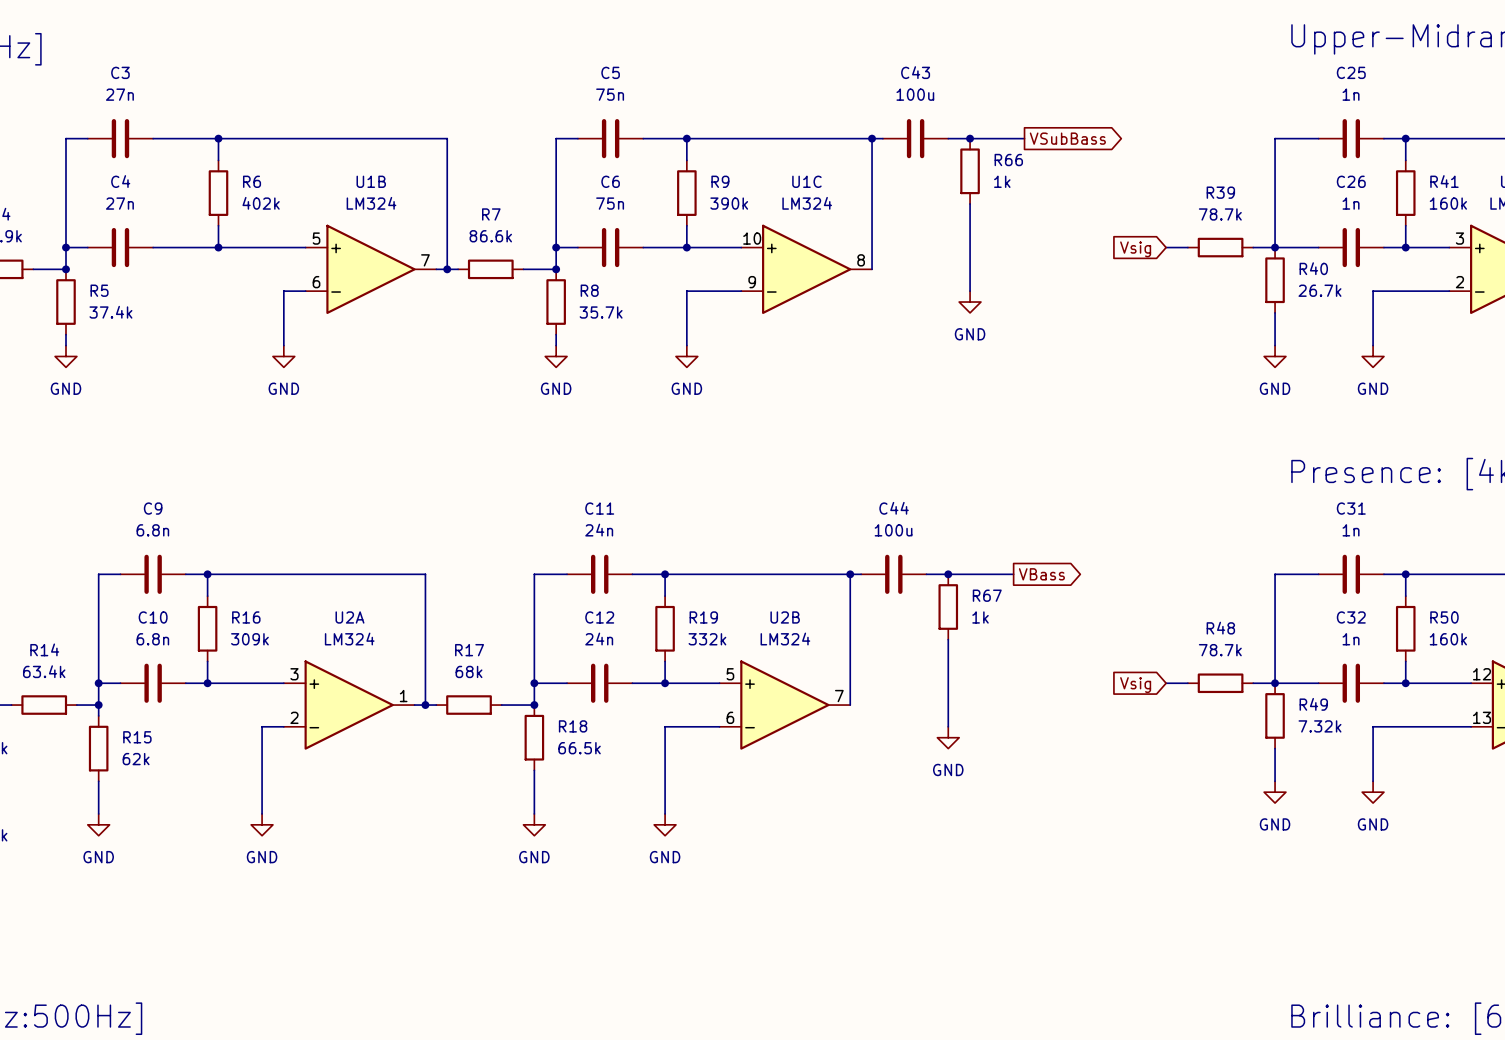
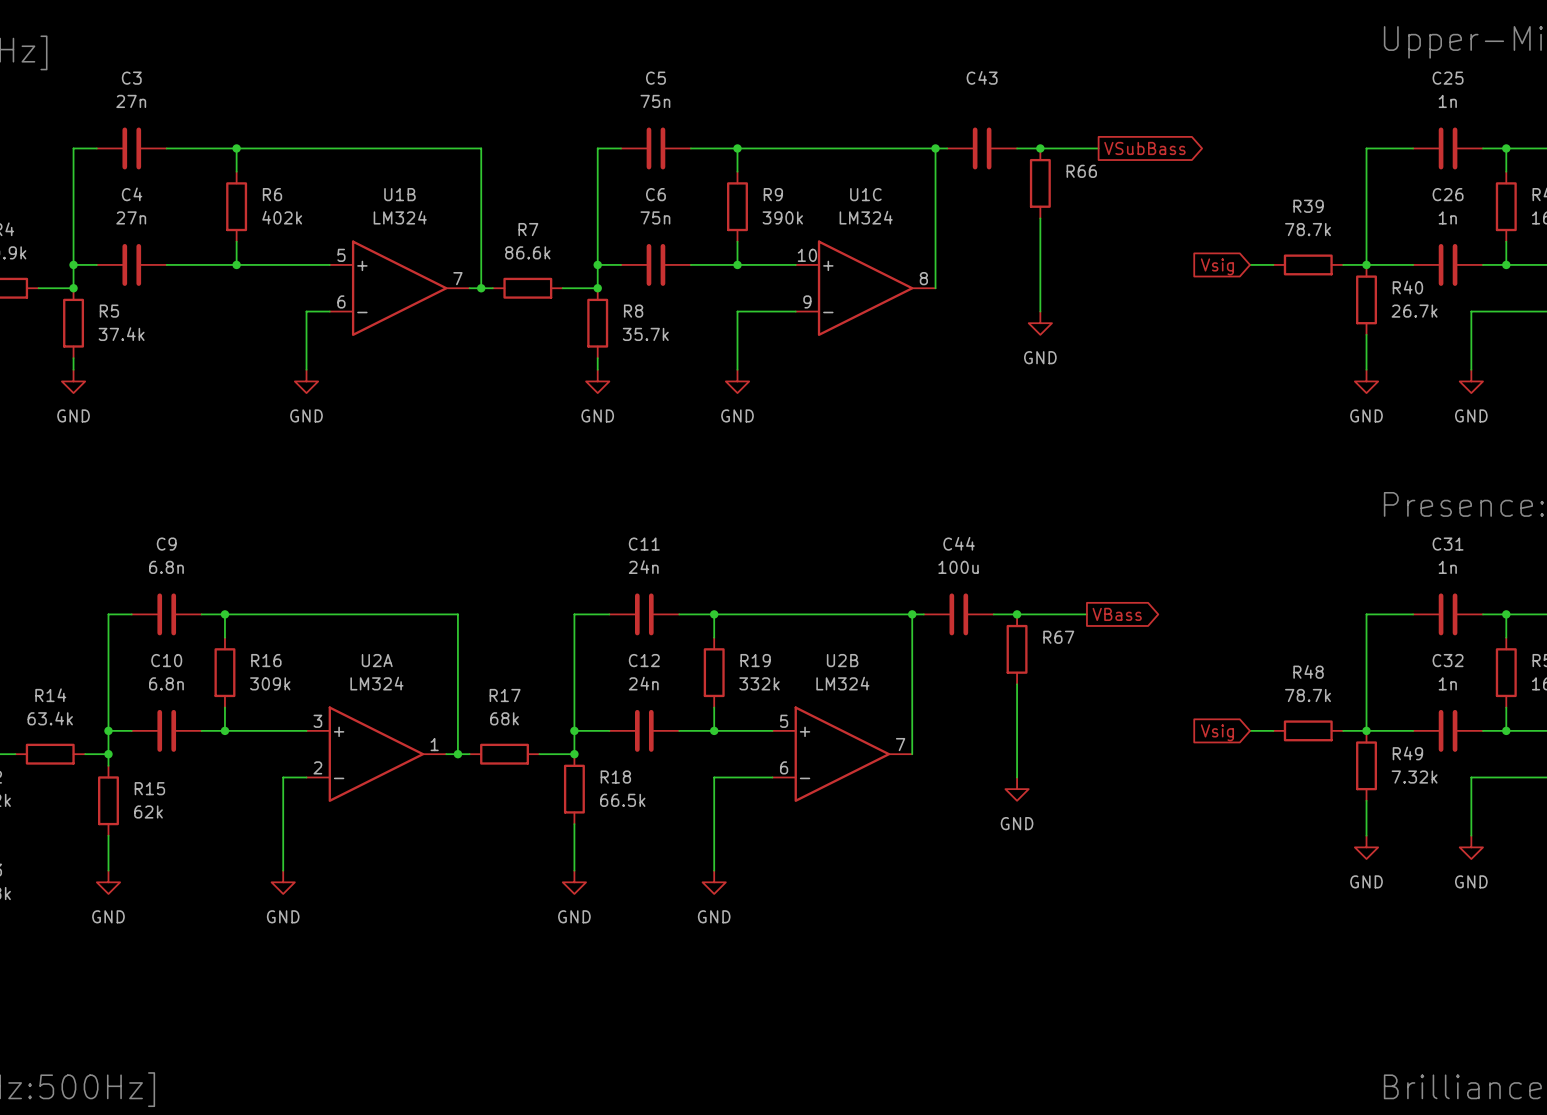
C43 value: 100u (915, 94) -> none
R66 value: 1k (1002, 181) -> none
R67 value: 1k (980, 617) -> none

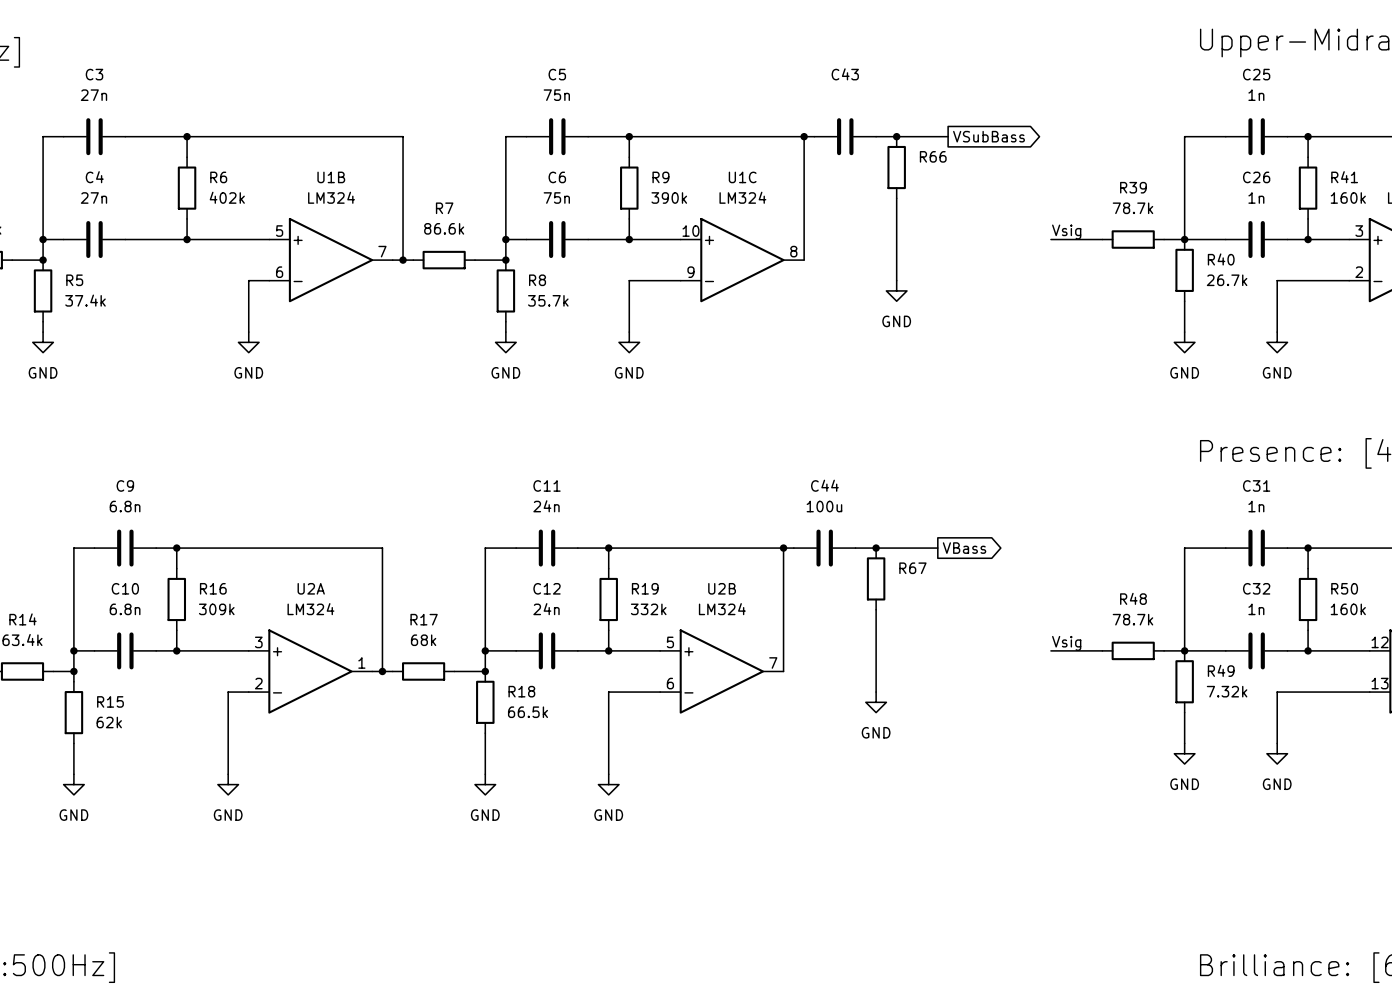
label: none -> Vsig (1066, 232)
wire: none -> (1050, 239) (1081, 239)
global label: Vsig (1217, 266) -> none
label: none -> Vsig (1066, 643)
wire: none -> (1050, 650) (1081, 650)
global label: Vsig (1217, 732) -> none

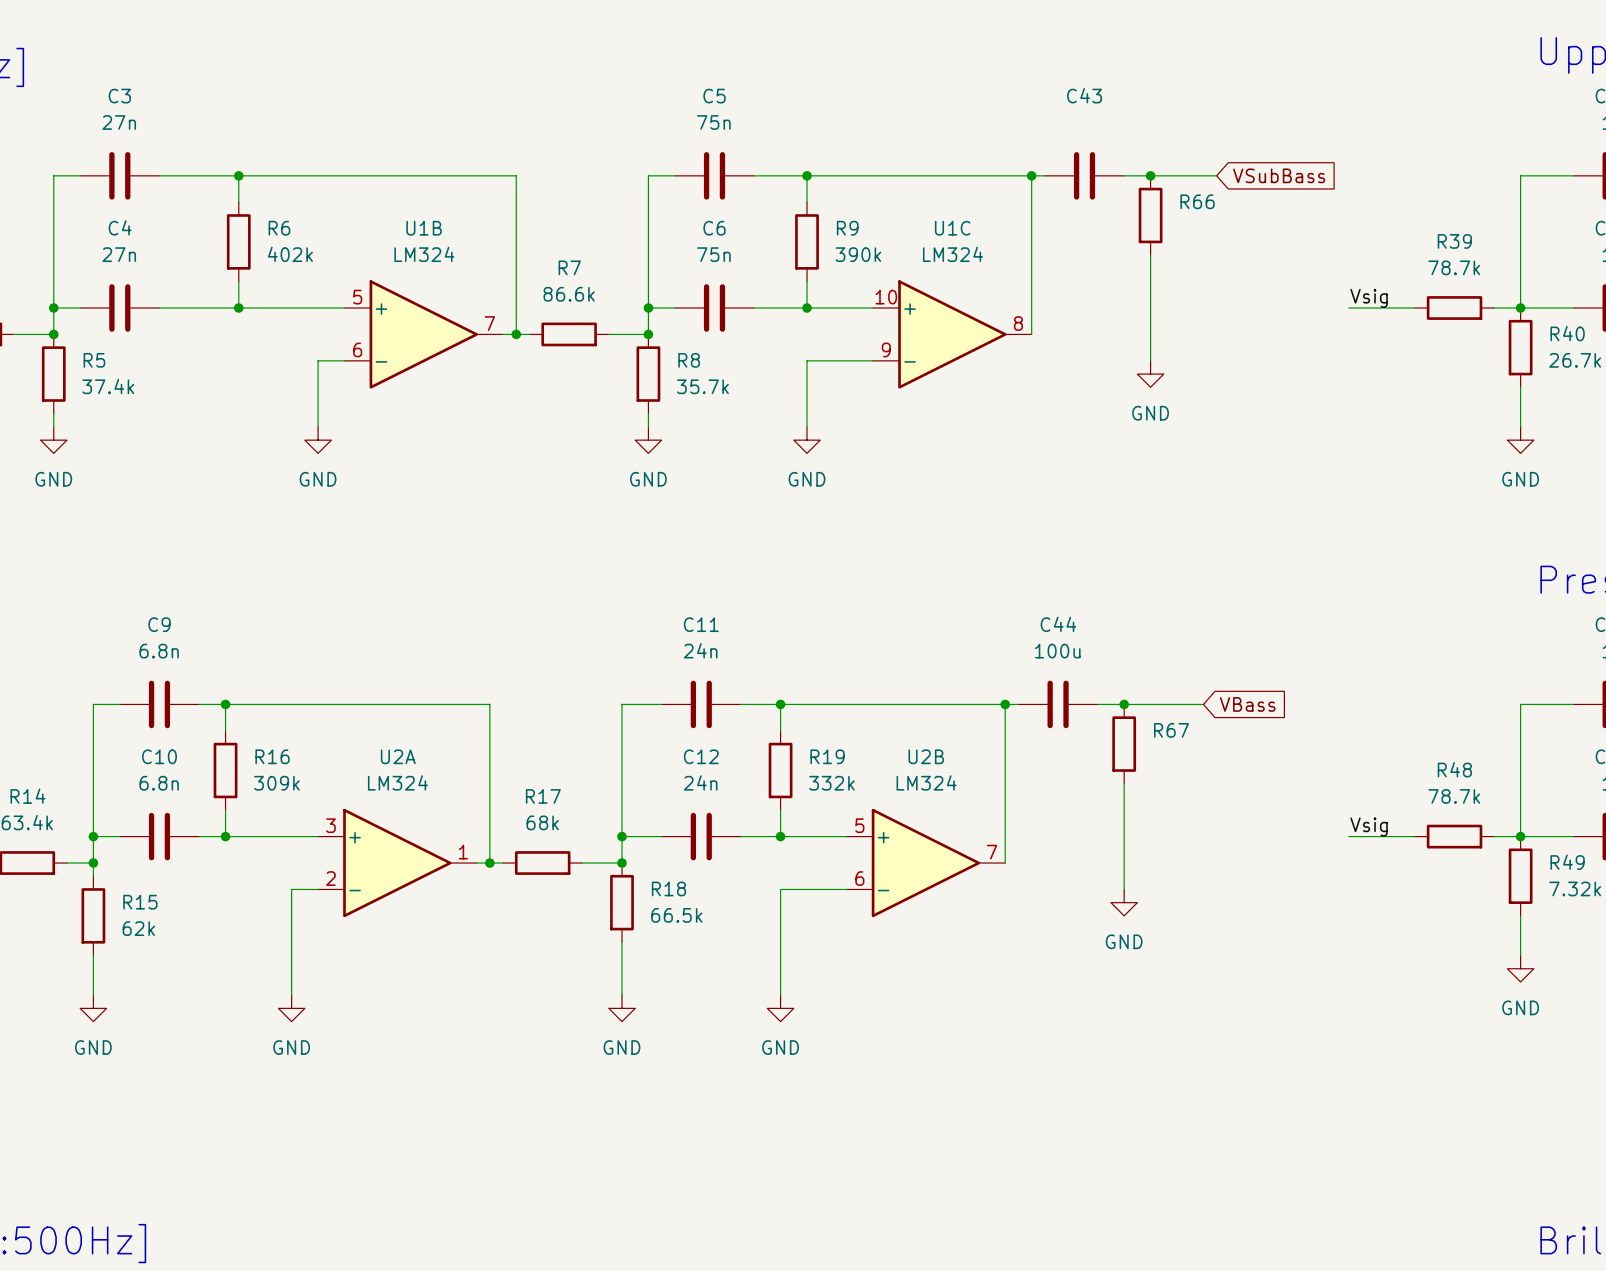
global label shape: output (989, 136) -> input (1279, 175)
global label shape: output (964, 548) -> input (1247, 704)

